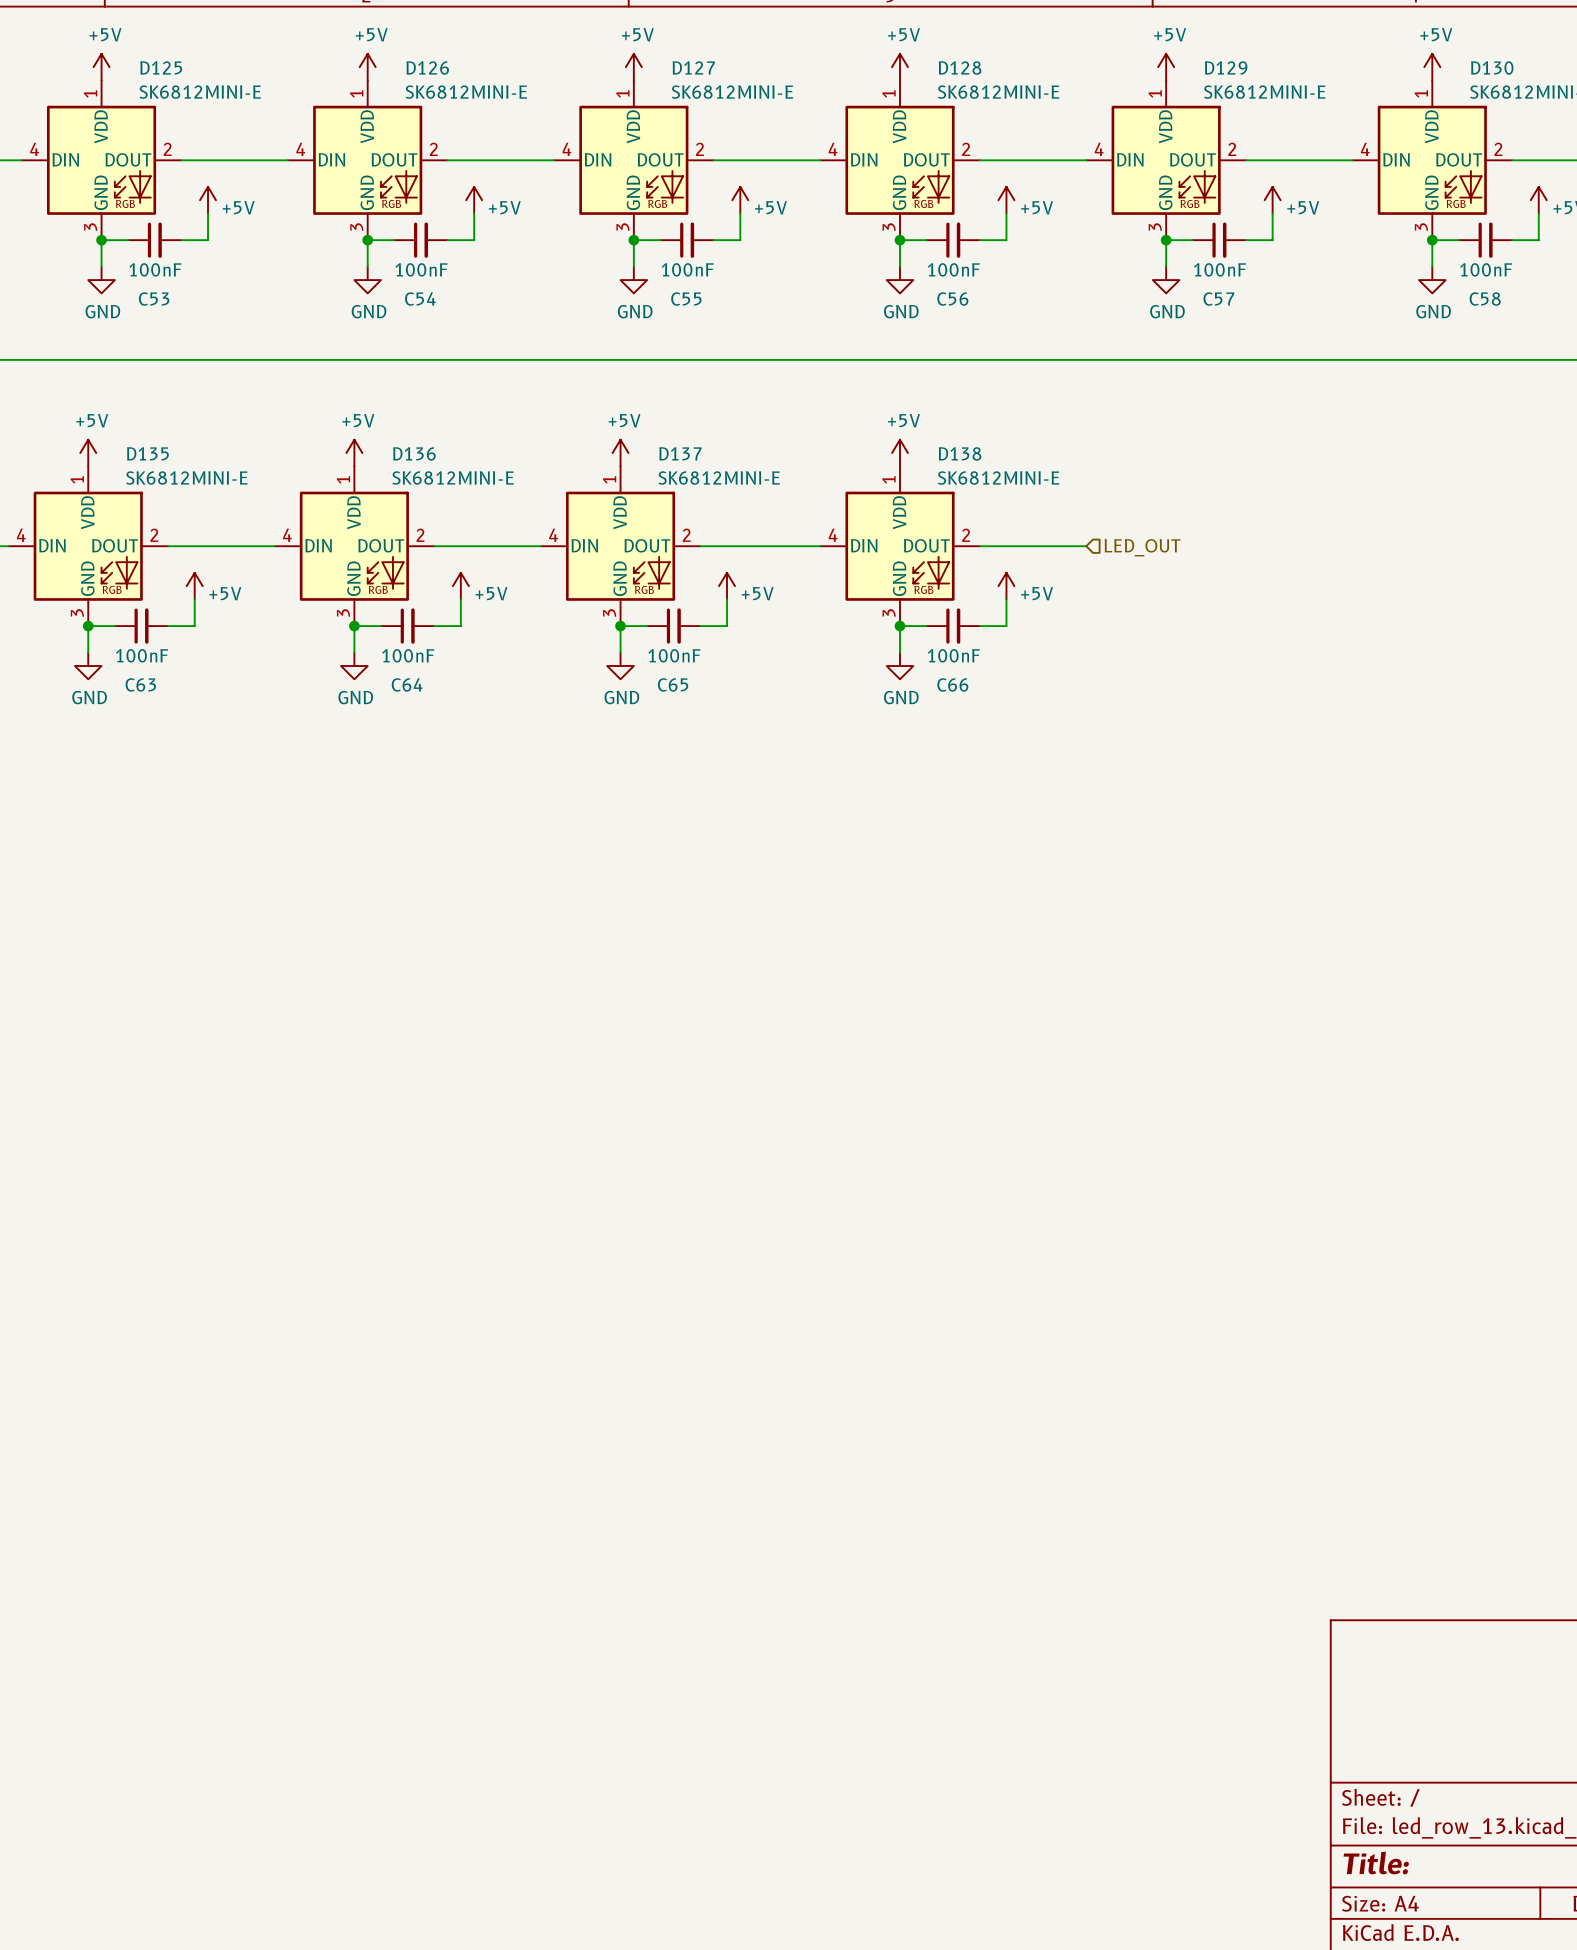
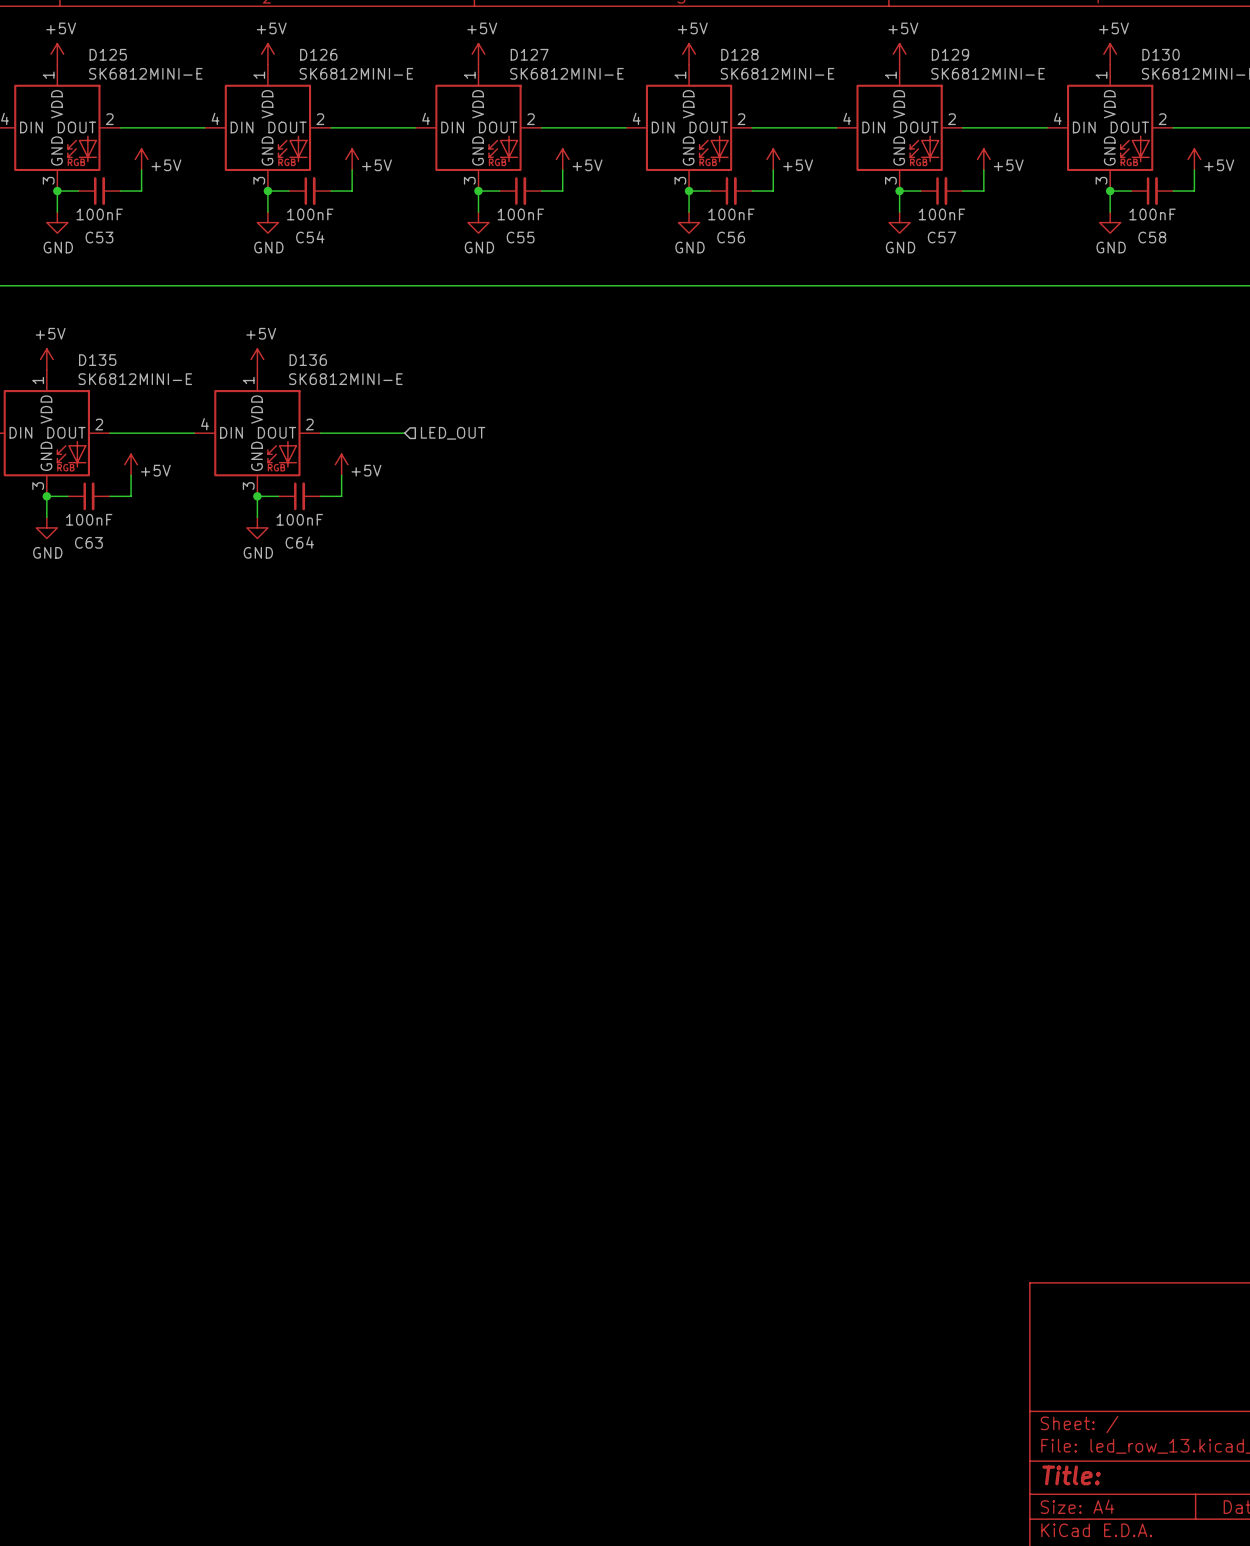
power symbol: +5V (620, 453) -> none
power symbol: +5V (900, 453) -> none
D137: SK6812MINI-E (620, 546) -> none
wire: (700, 546) (820, 546) -> none
D138: SK6812MINI-E (900, 546) -> none
wire: (979, 546) (1086, 546) -> none
hierarchical label: none -> LED_OUT (453, 433)
hierarchical label: LED_OUT (1142, 547) -> none
power symbol: +5V (727, 586) -> none
power symbol: +5V (1006, 586) -> none
wire: (727, 599) (727, 626) (700, 626) -> none
wire: (1006, 599) (1006, 626) (979, 626) -> none
junction: (620, 626) -> none
wire: (647, 626) (620, 626) (620, 652) -> none
C65: 100nF (673, 626) -> none
junction: (900, 626) -> none
wire: (926, 626) (900, 626) (900, 652) -> none
C66: 100nF (953, 626) -> none
power symbol: GND (620, 665) -> none
power symbol: GND (900, 665) -> none

